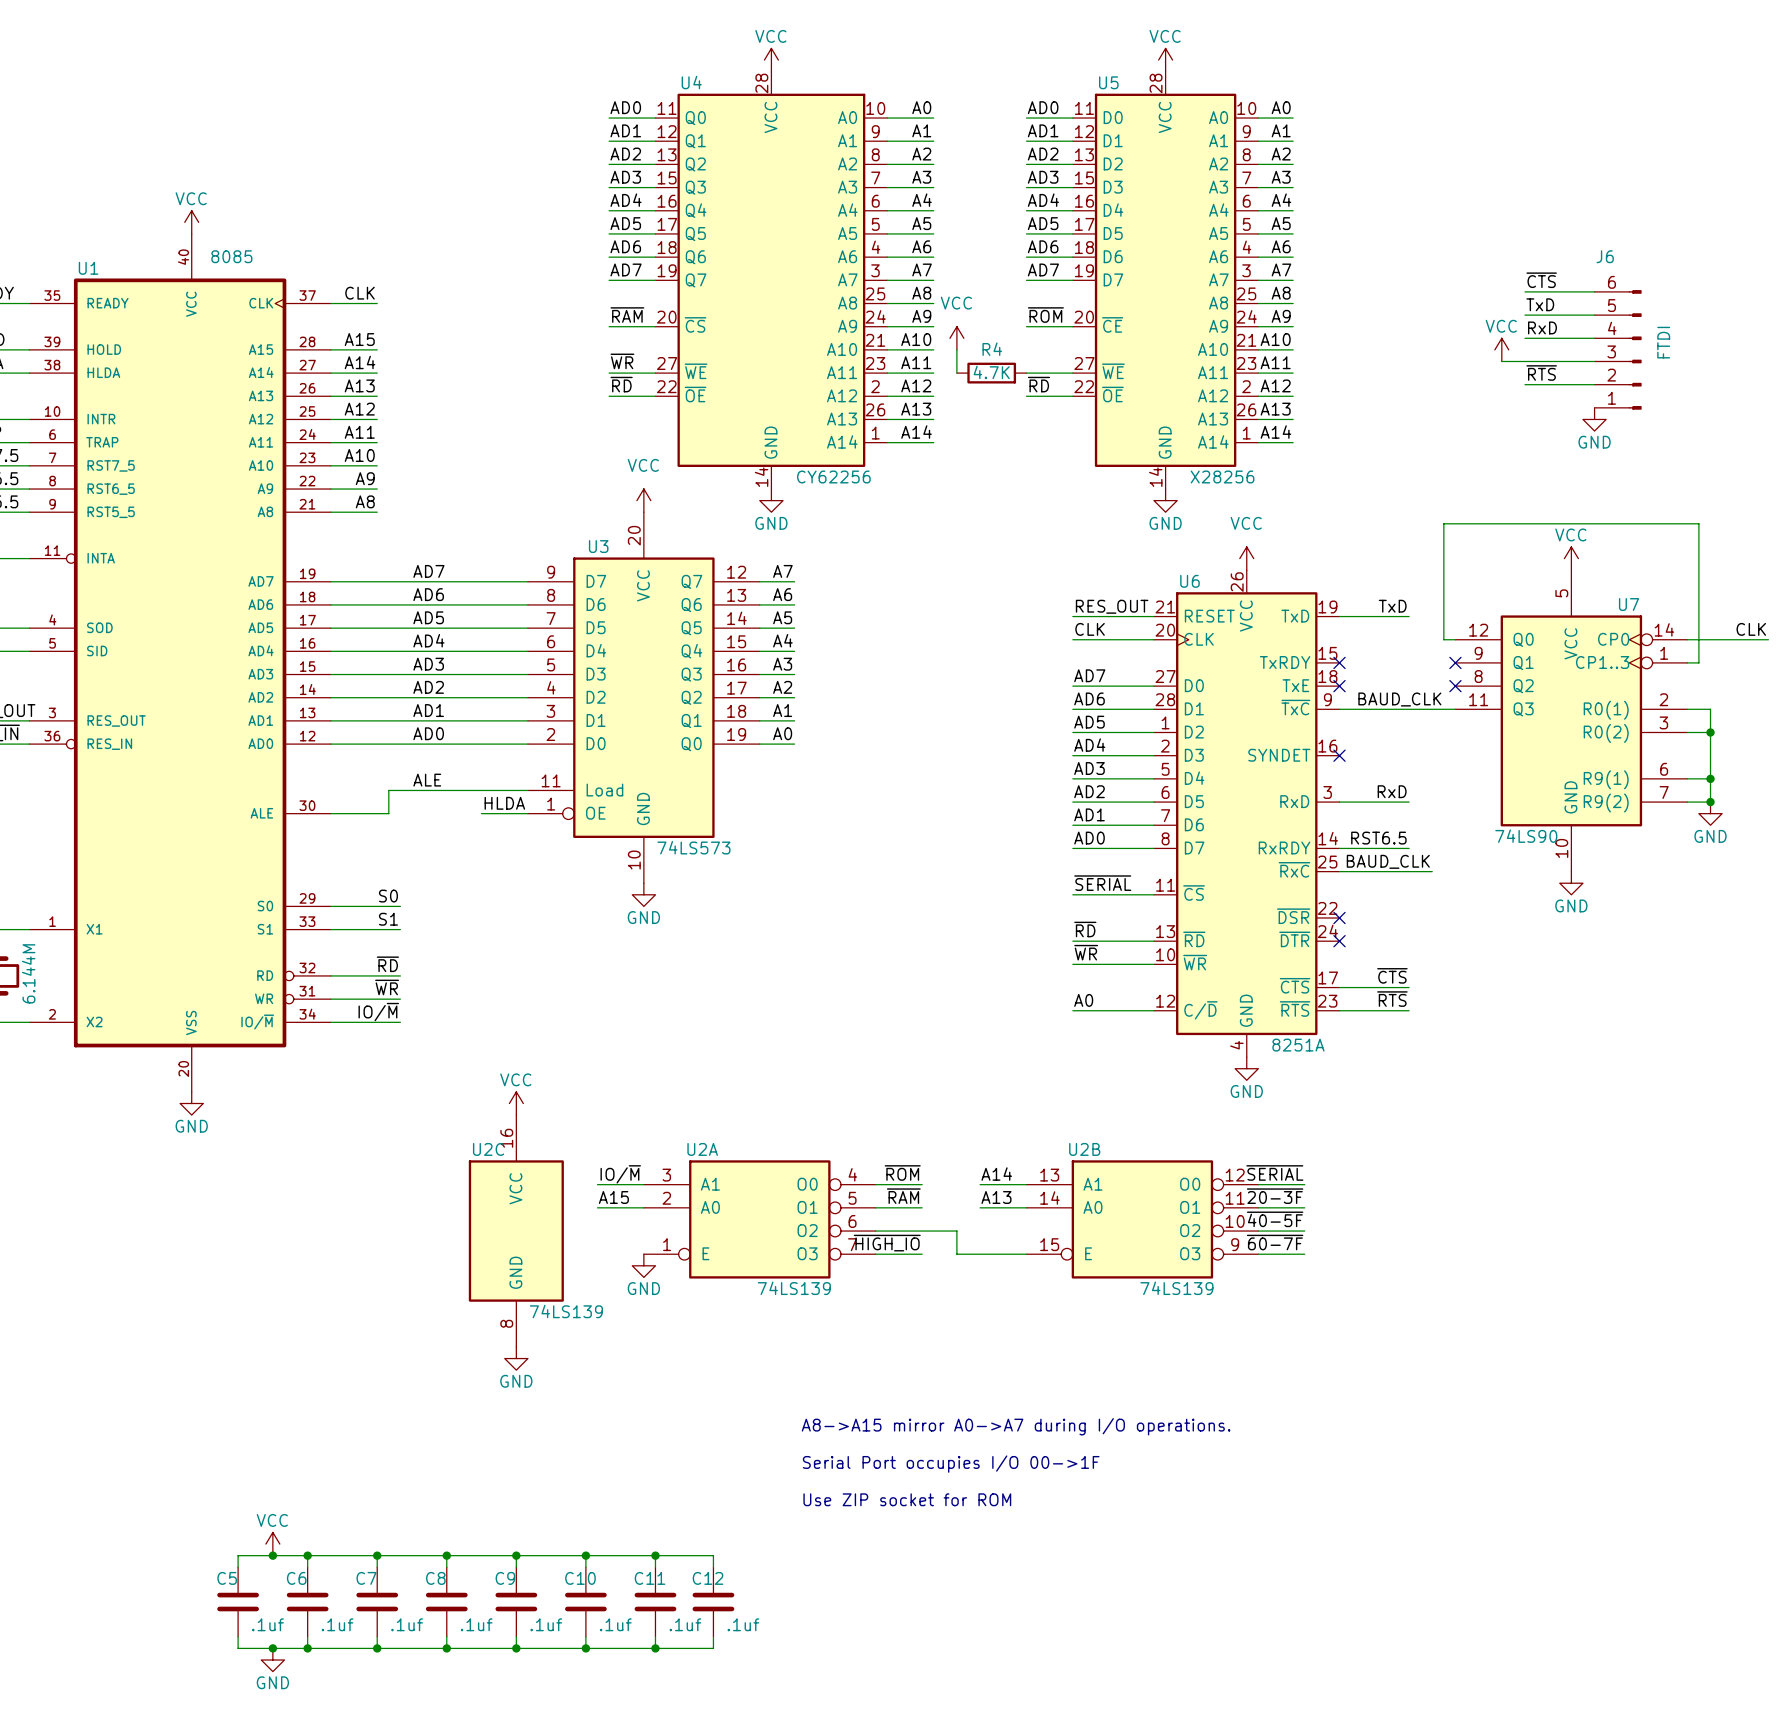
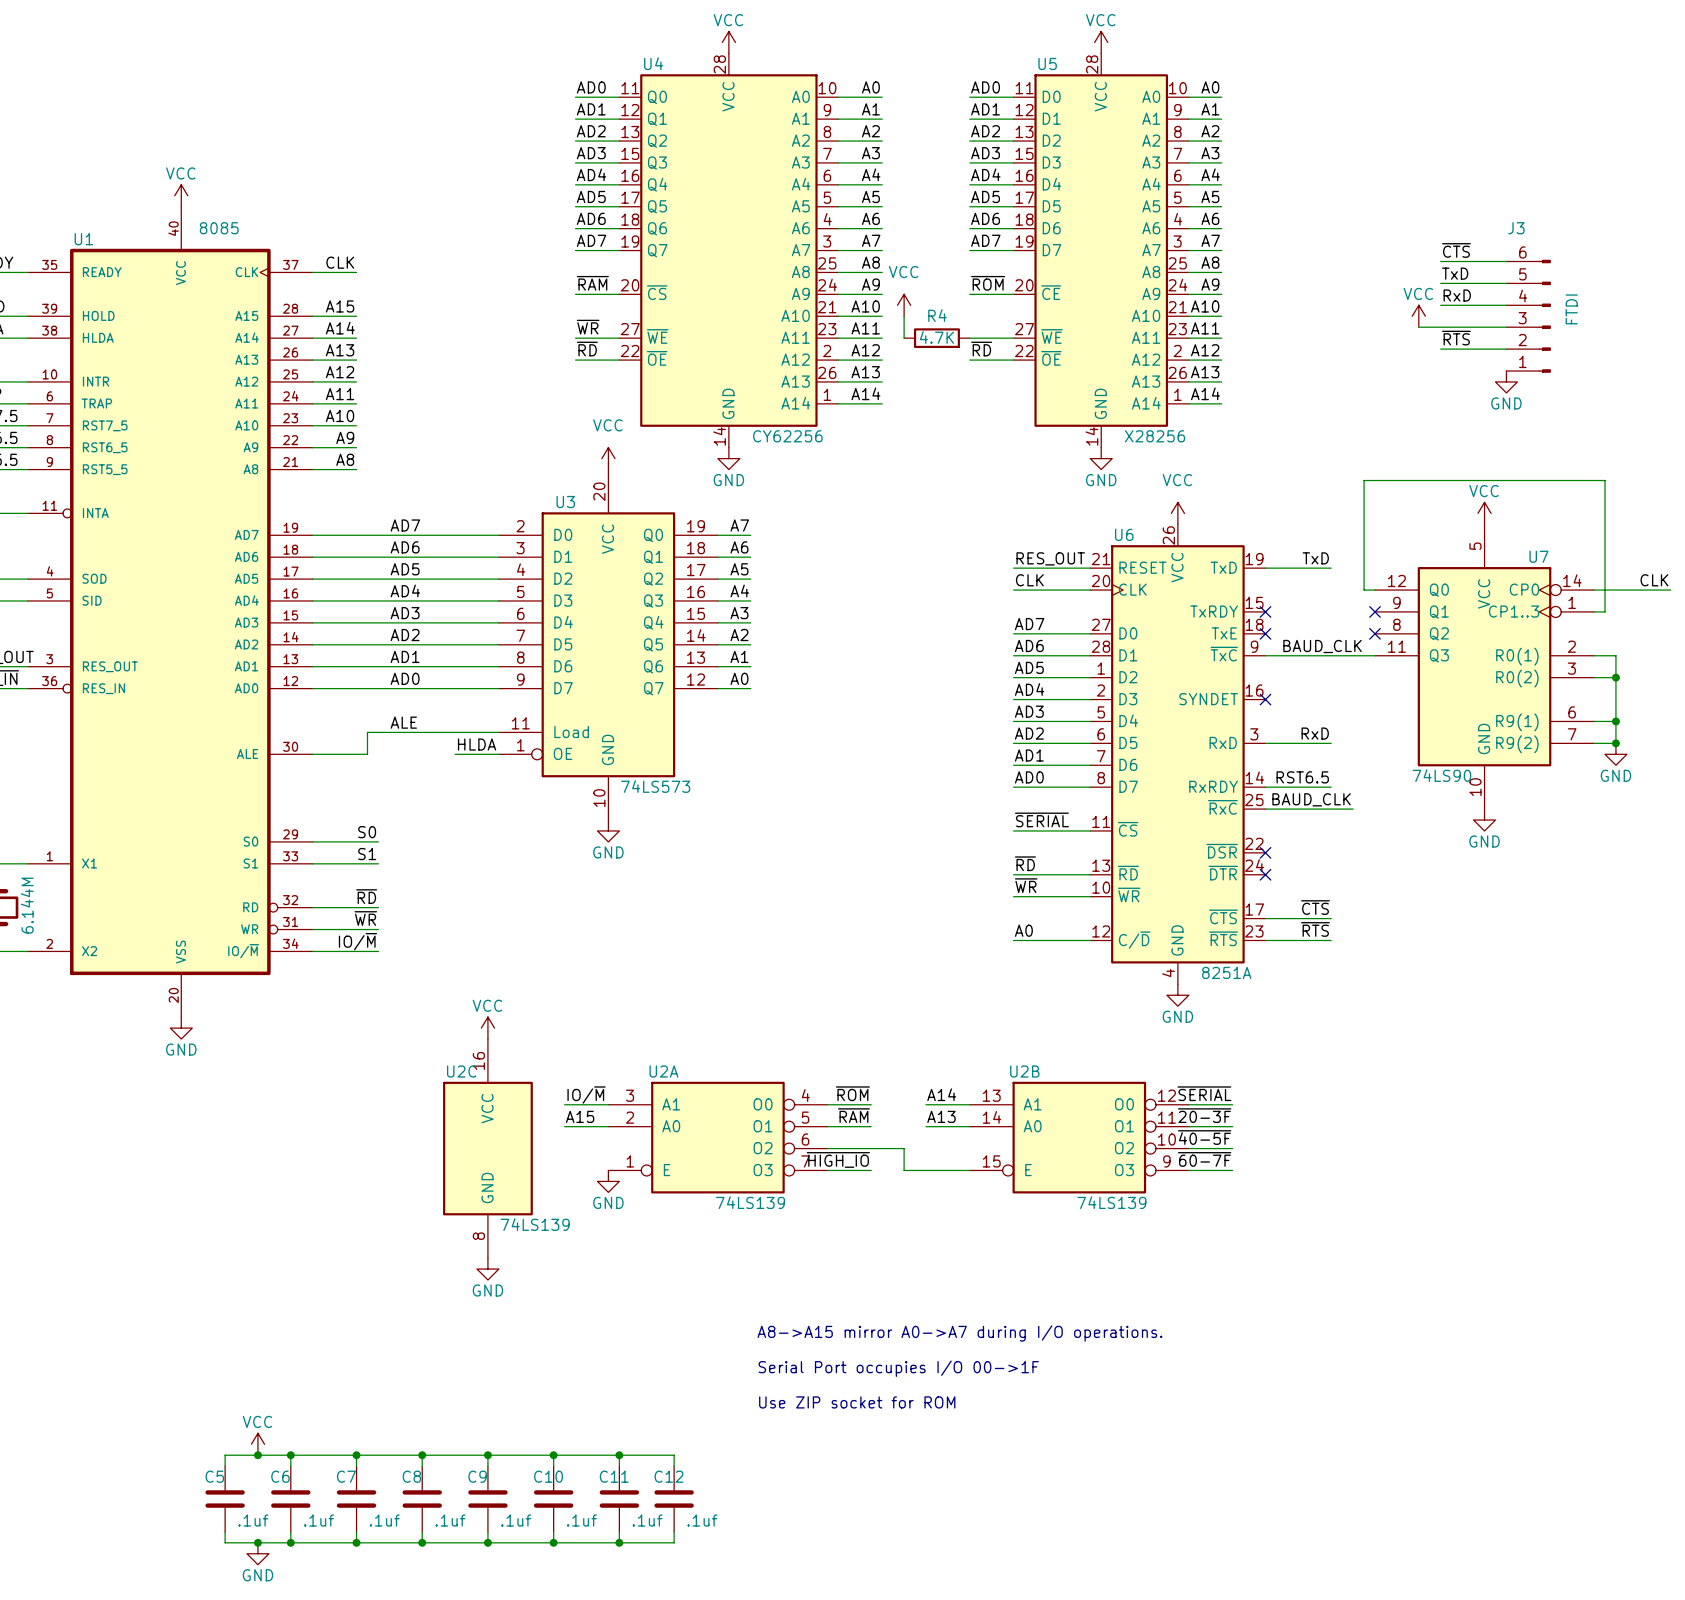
J6 name: J6 (1605, 256) -> J3 (1516, 228)
U3 symbol: [527, 512, 760, 884] -> [498, 469, 718, 821]

